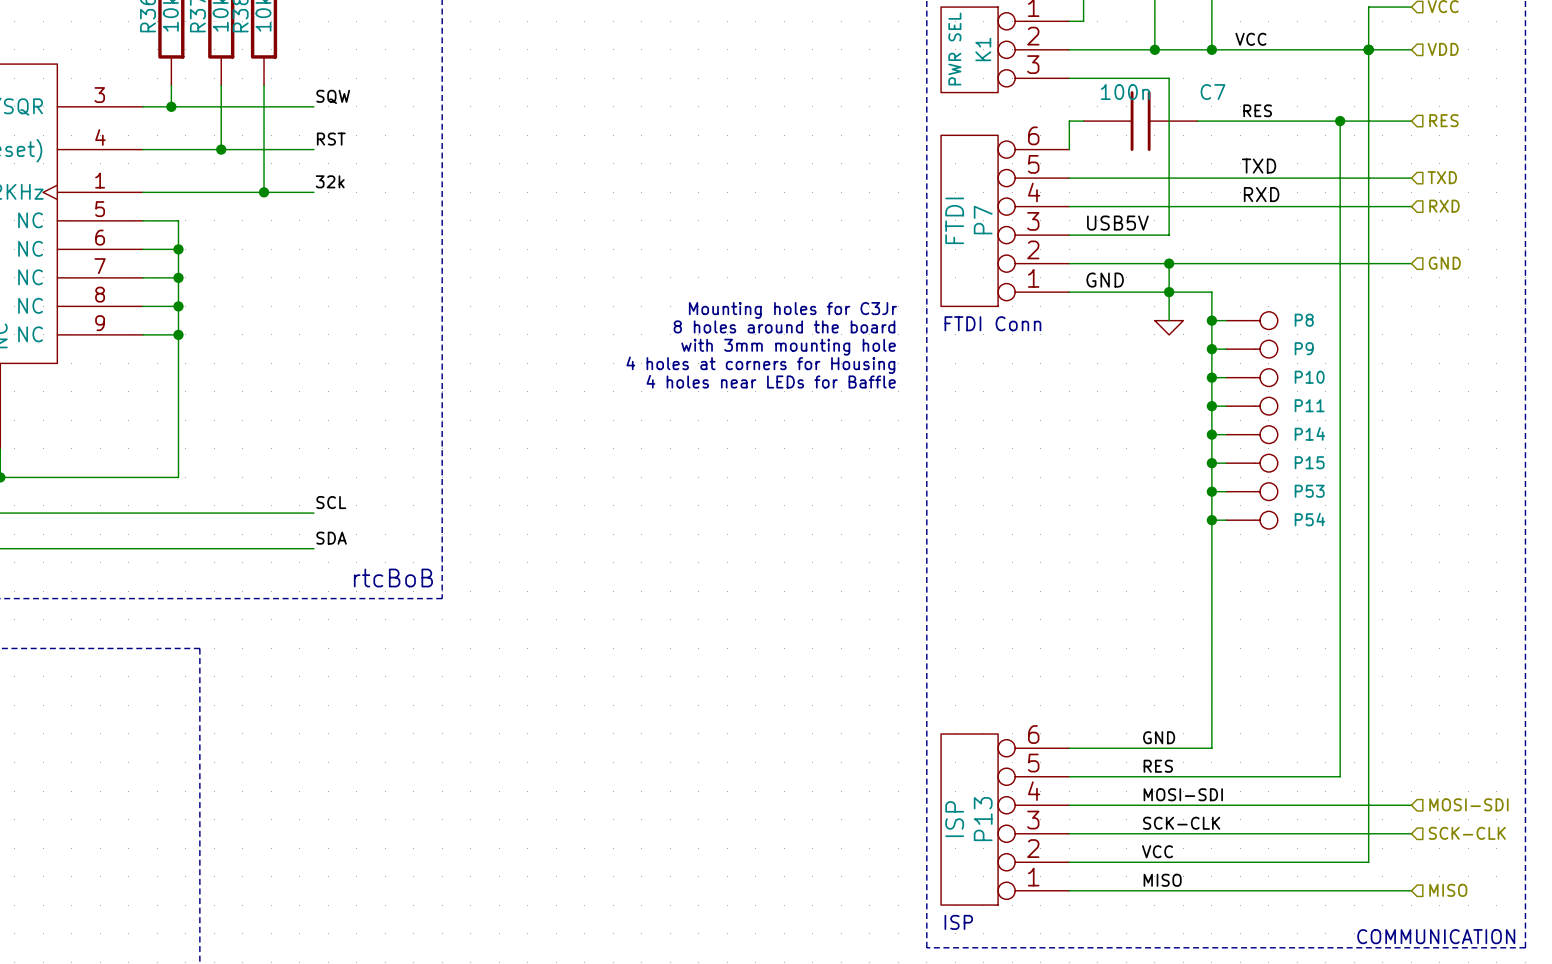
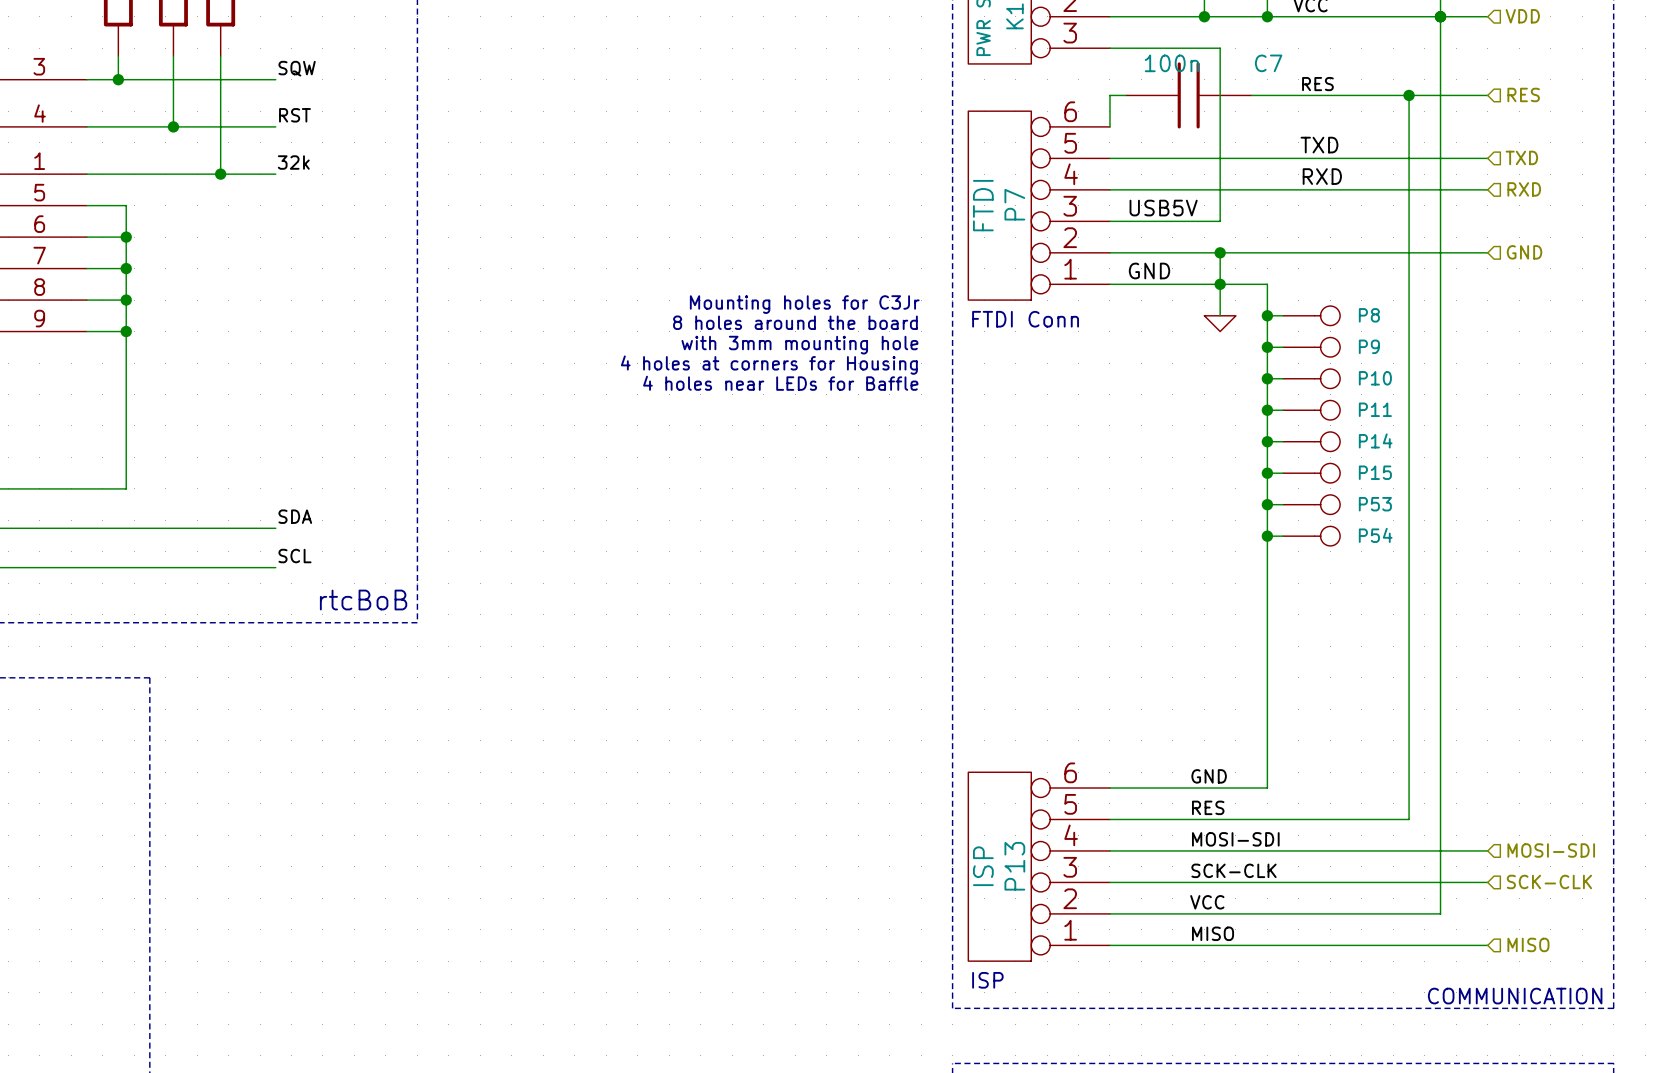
label: SCL (331, 502) -> SDA (295, 516)
label: SDA (331, 538) -> SCL (294, 556)

